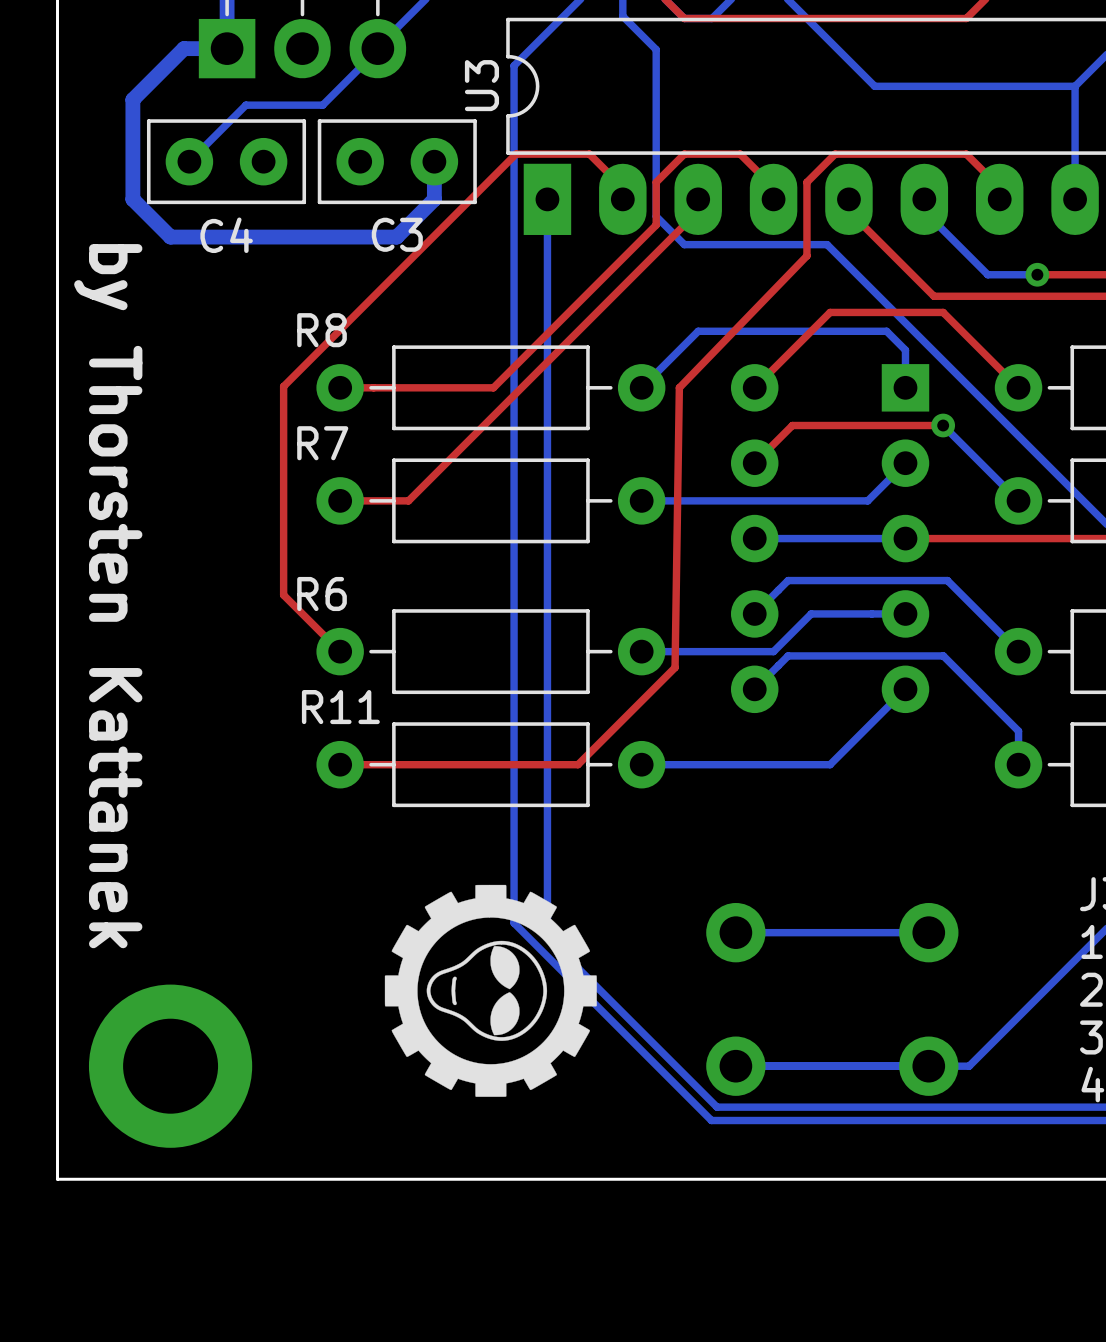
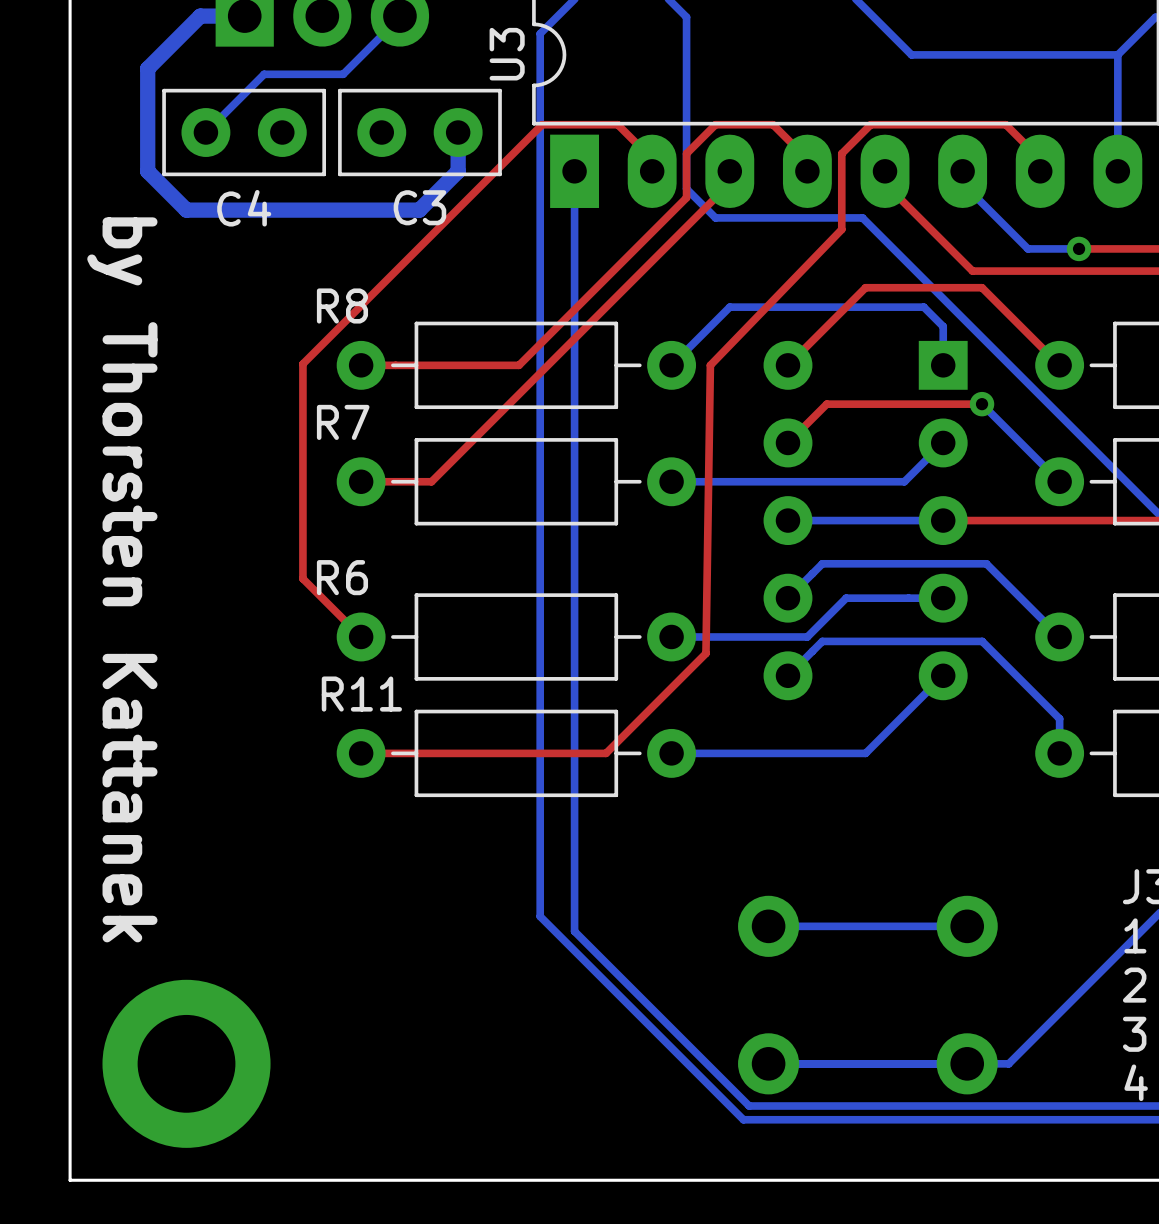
drawing: [384, 884, 597, 1097] -> none

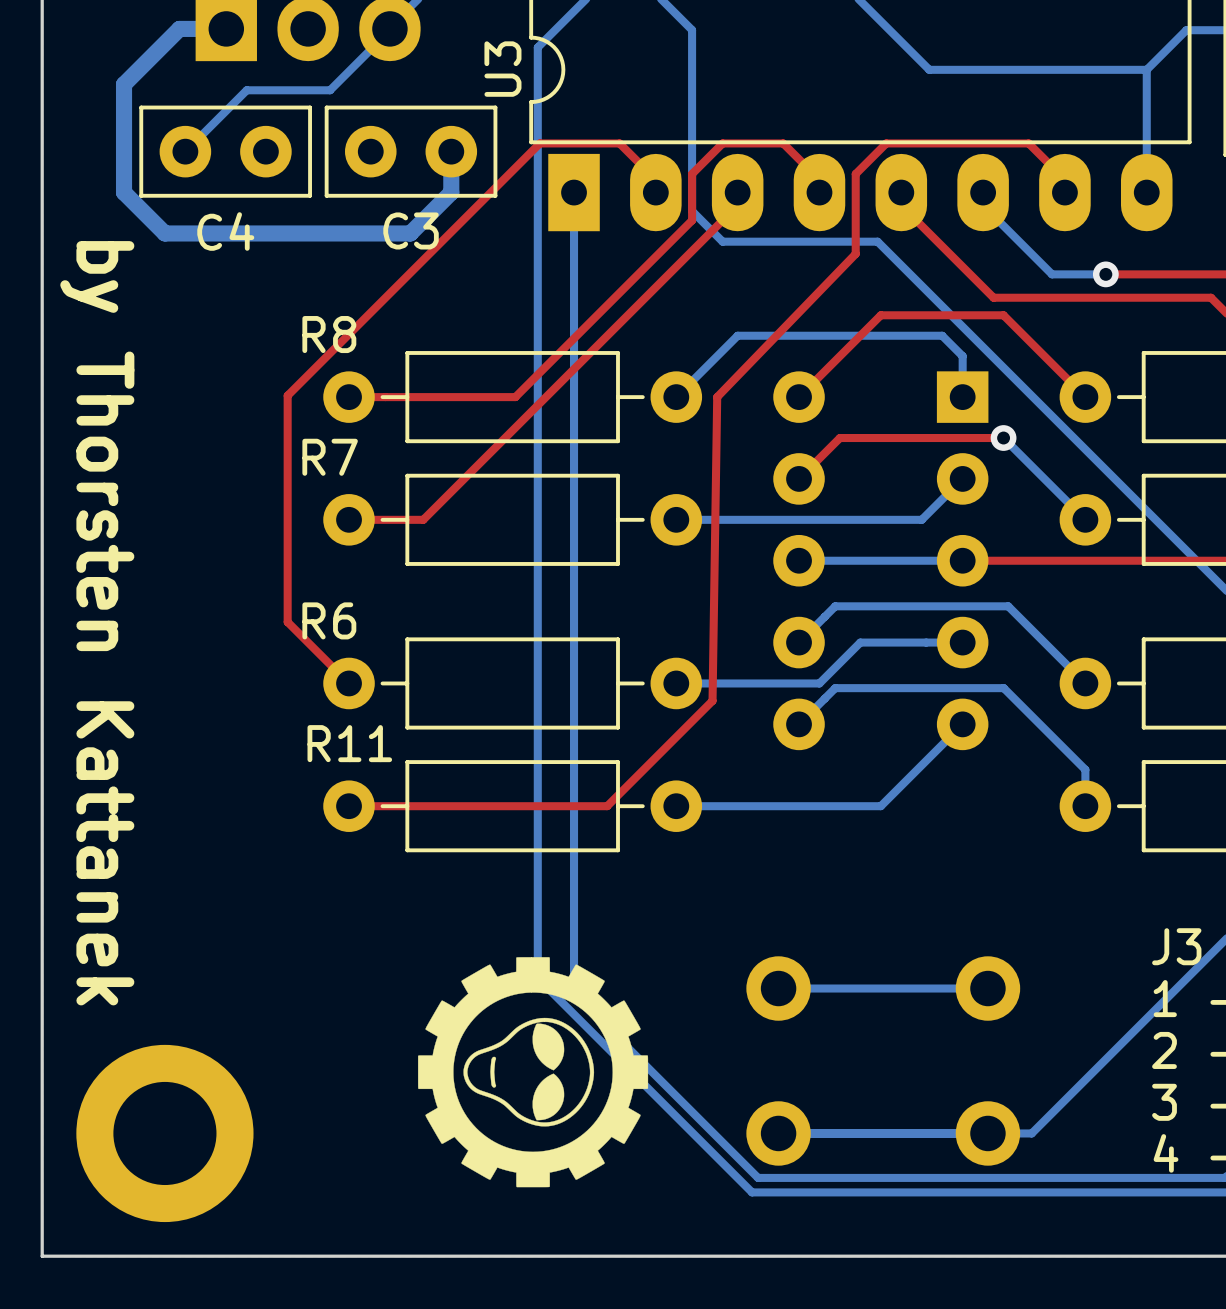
drawing: none -> [418, 957, 649, 1188]

